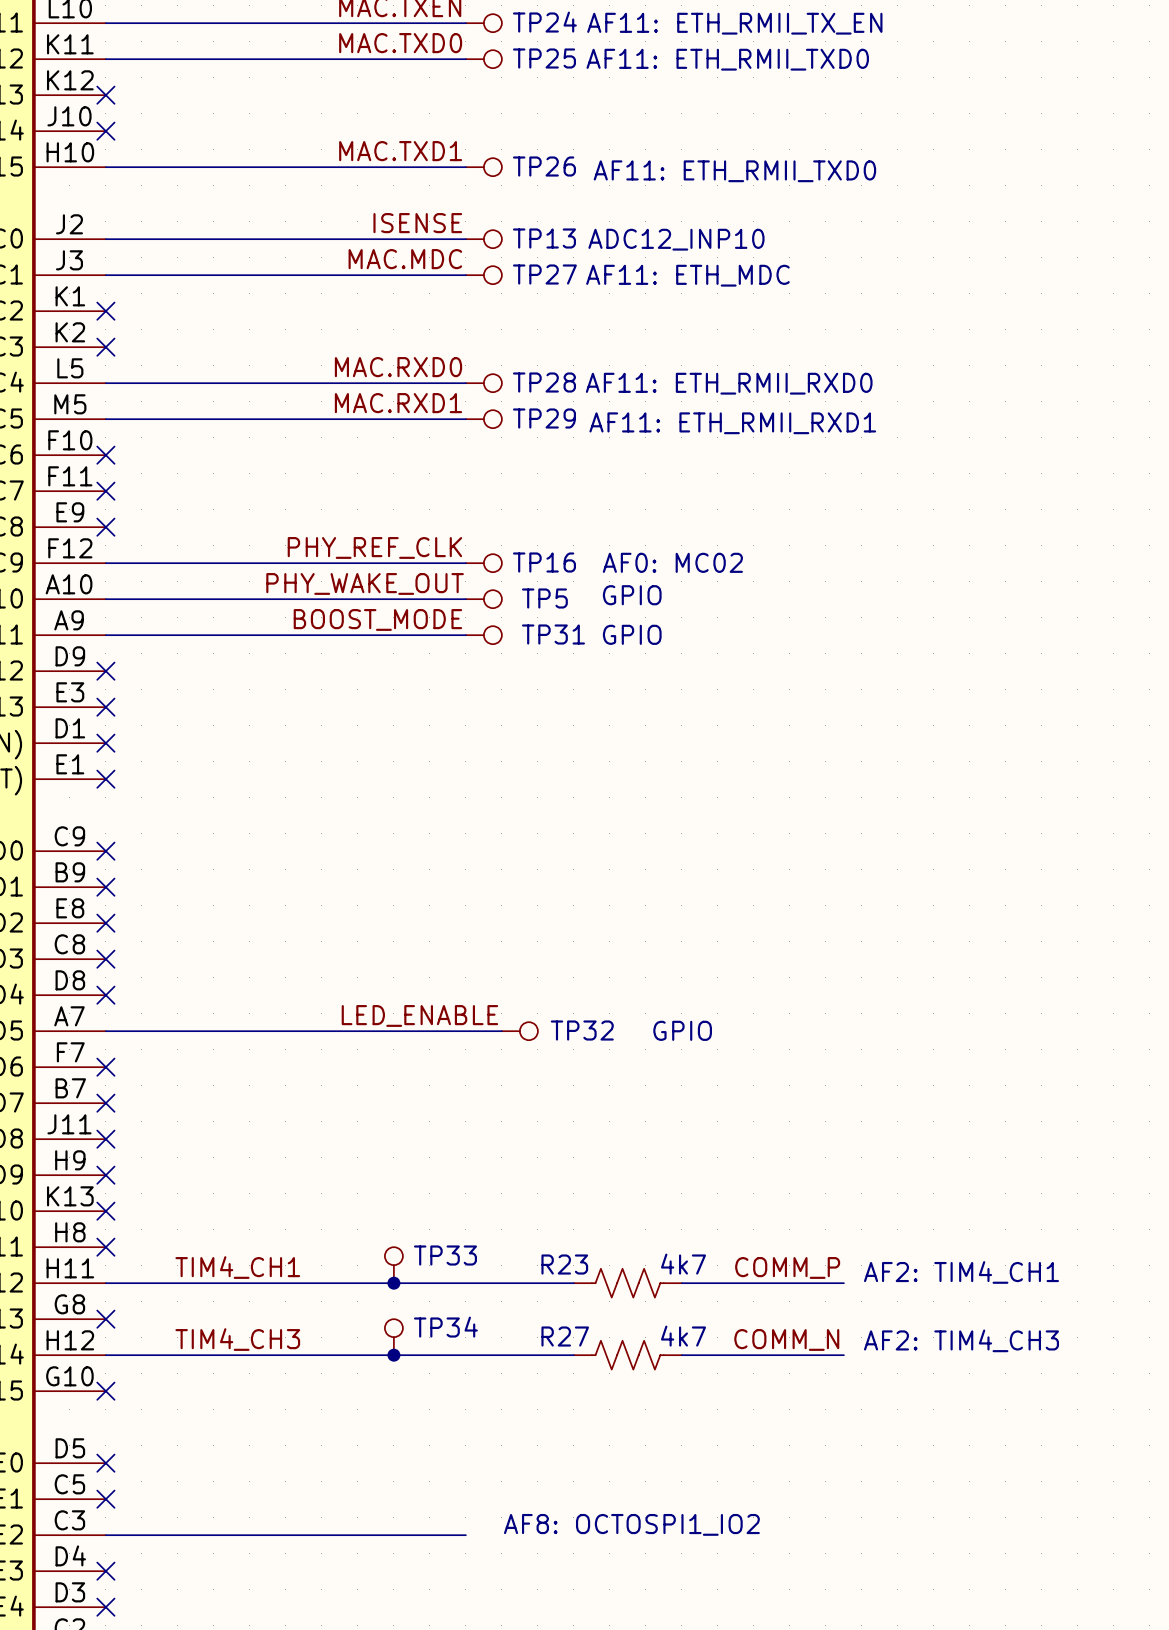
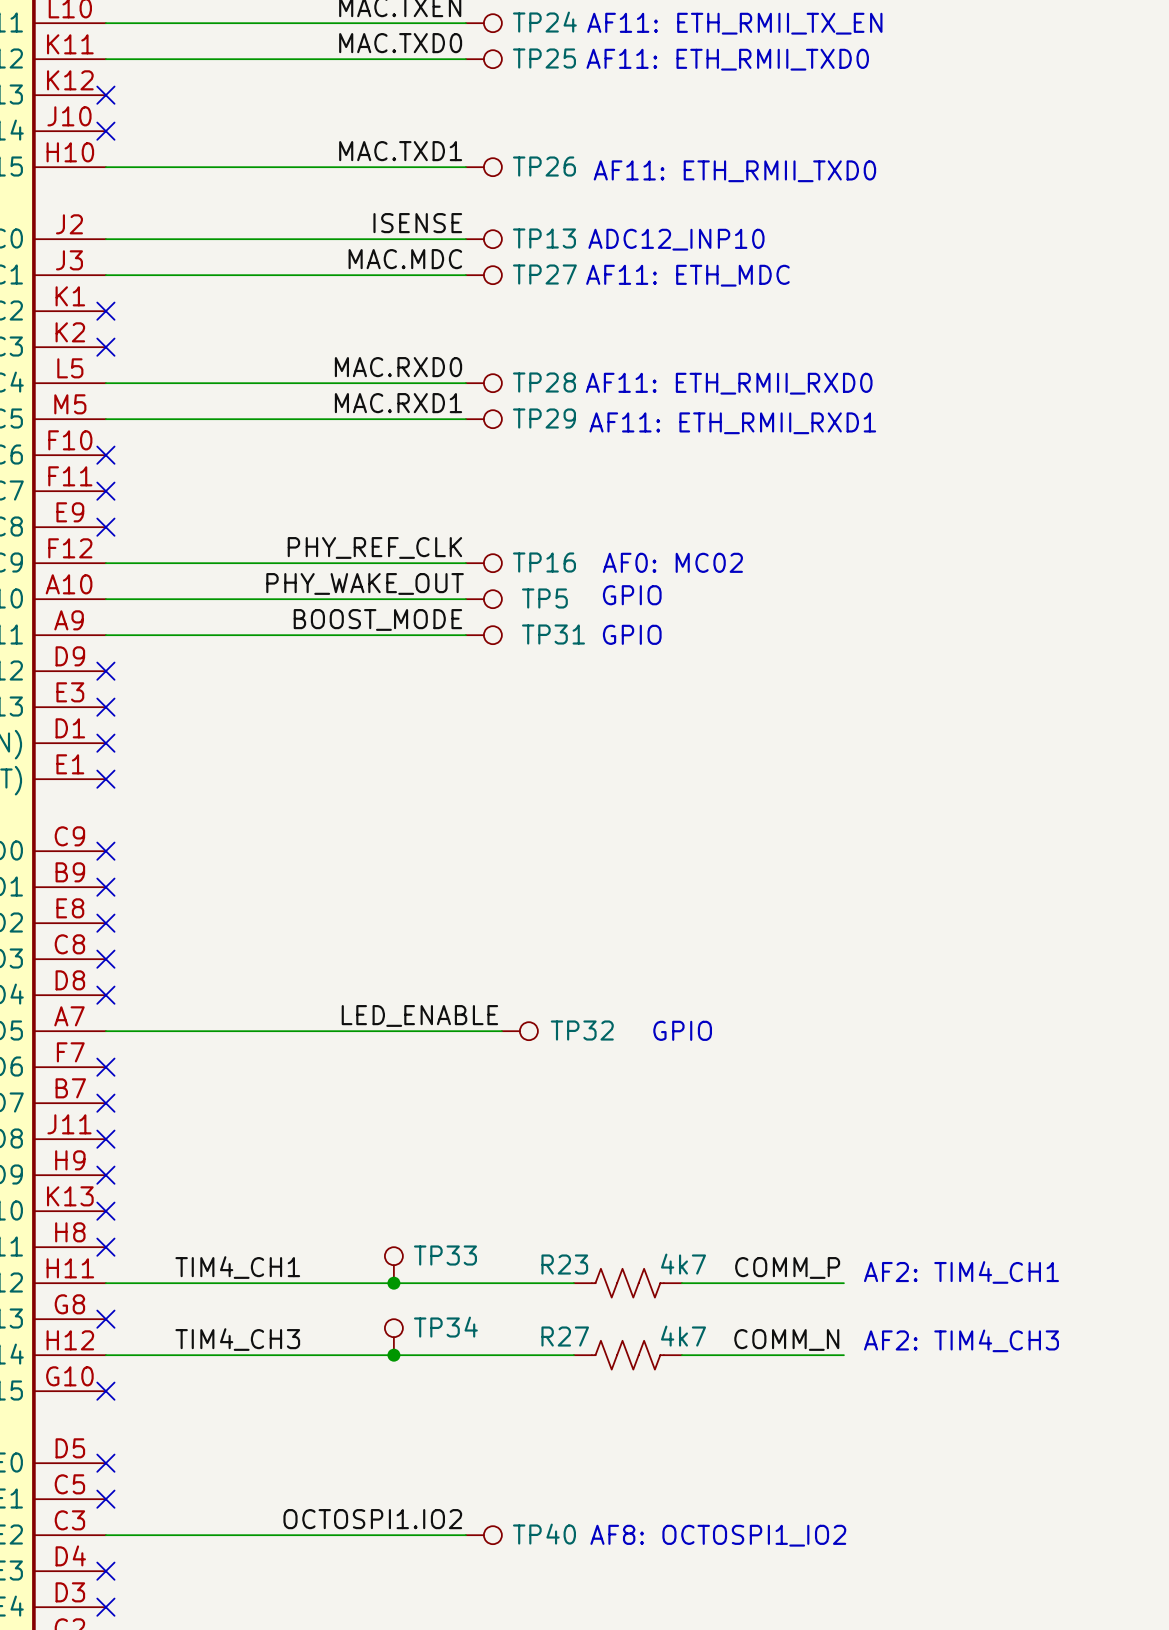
label: none -> OCTOSPI1.IO2 (372, 1519)
text position: AF8: OCTOSPI1_IO2 (631, 1524) -> AF8: OCTOSPI1_IO2 (718, 1535)
TP40: none -> (483, 1535)

